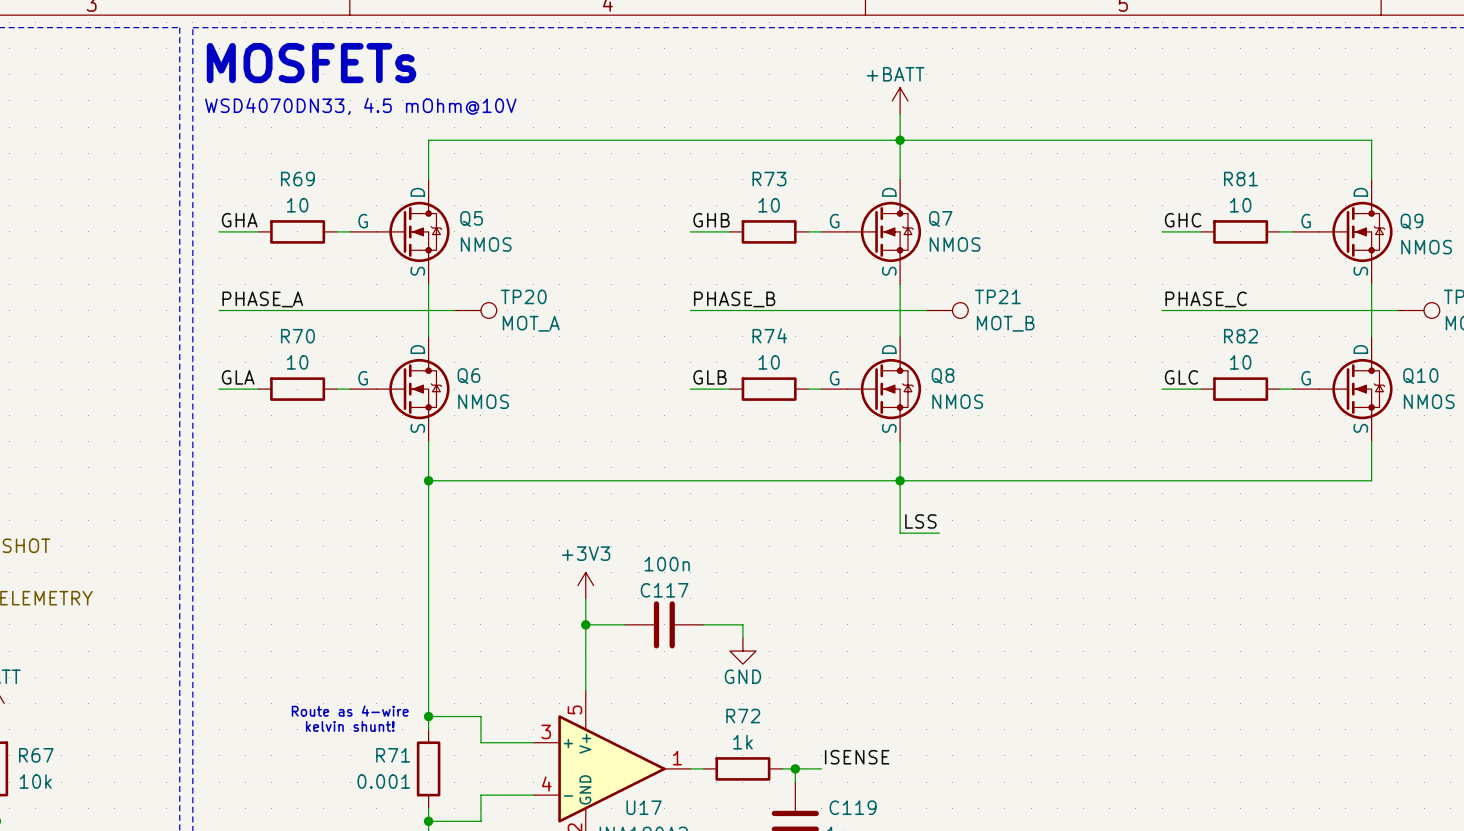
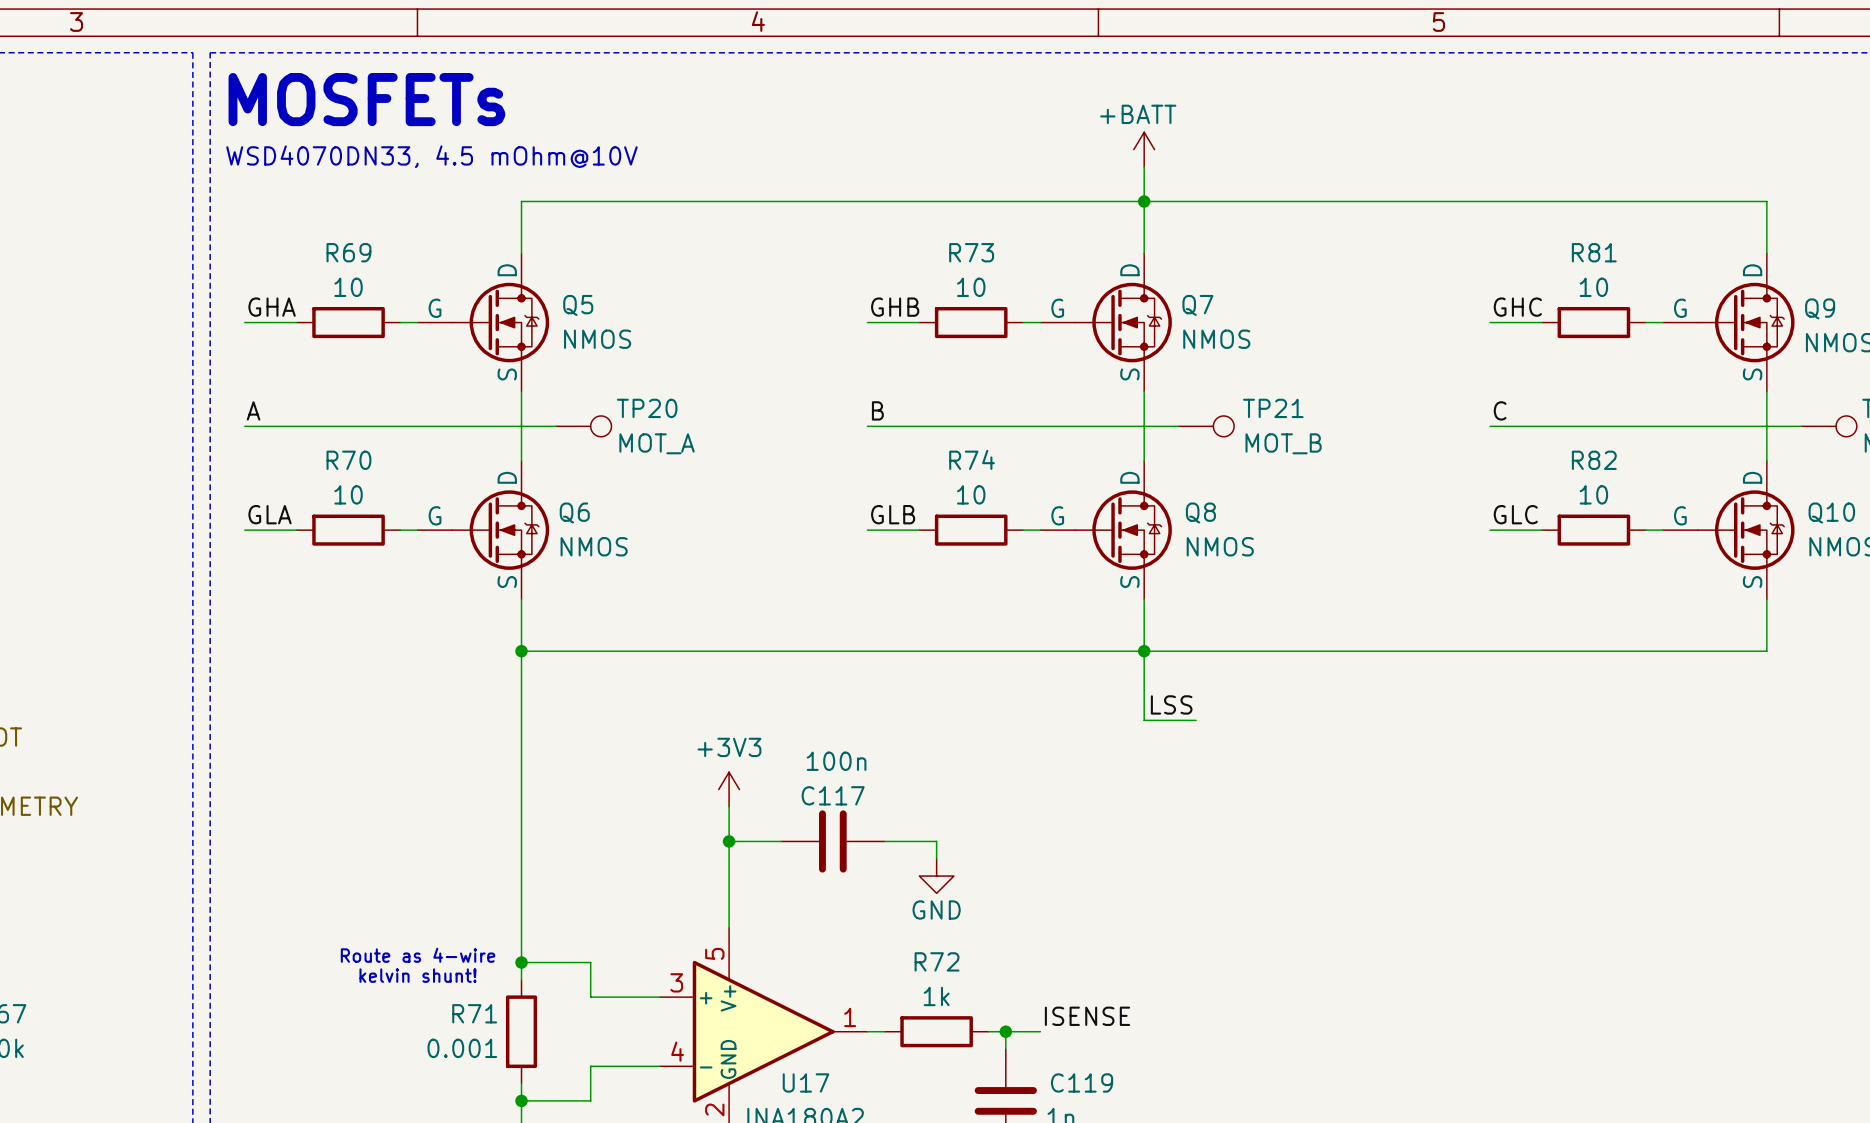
label: PHASE_A (262, 299) -> A (253, 410)
label: PHASE_B (734, 299) -> B (877, 410)
label: PHASE_C (1206, 299) -> C (1500, 410)

